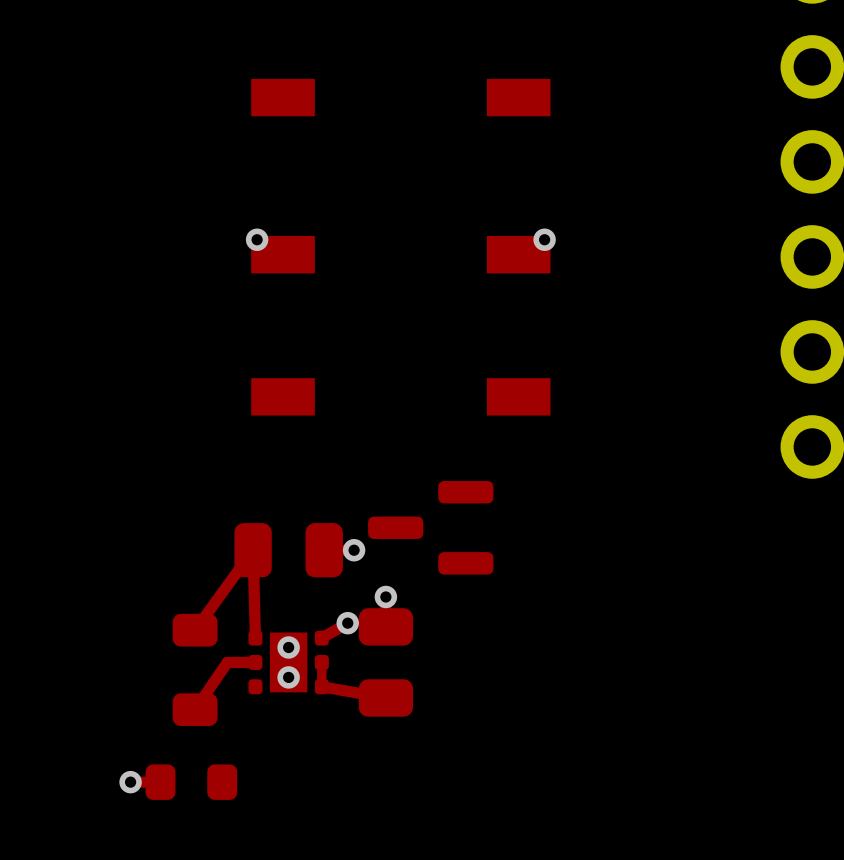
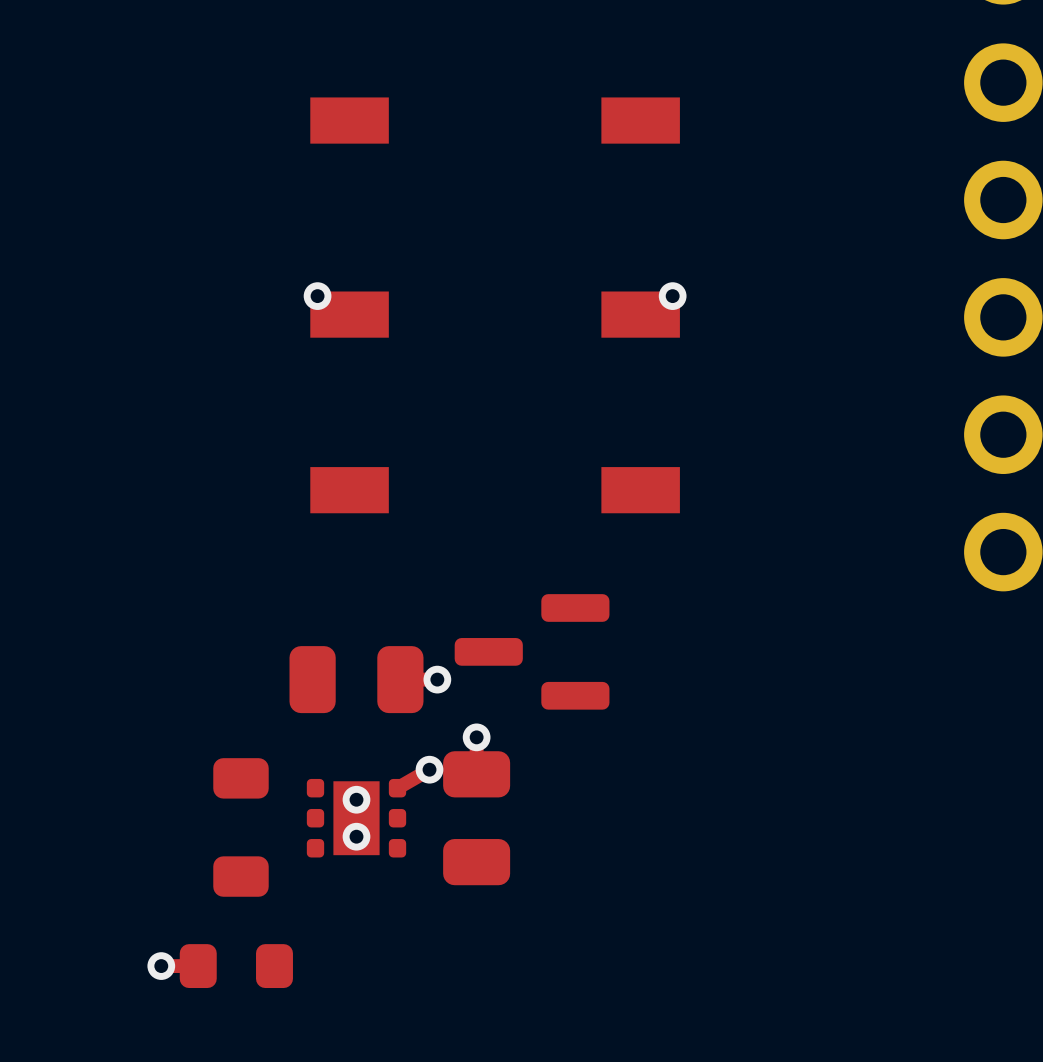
top track: (195, 630) (253, 550) (255, 638) -> none
top track: (255, 662) (227, 662) (195, 709) -> none
top track: (321, 662) (321, 686) (385, 697) -> none

